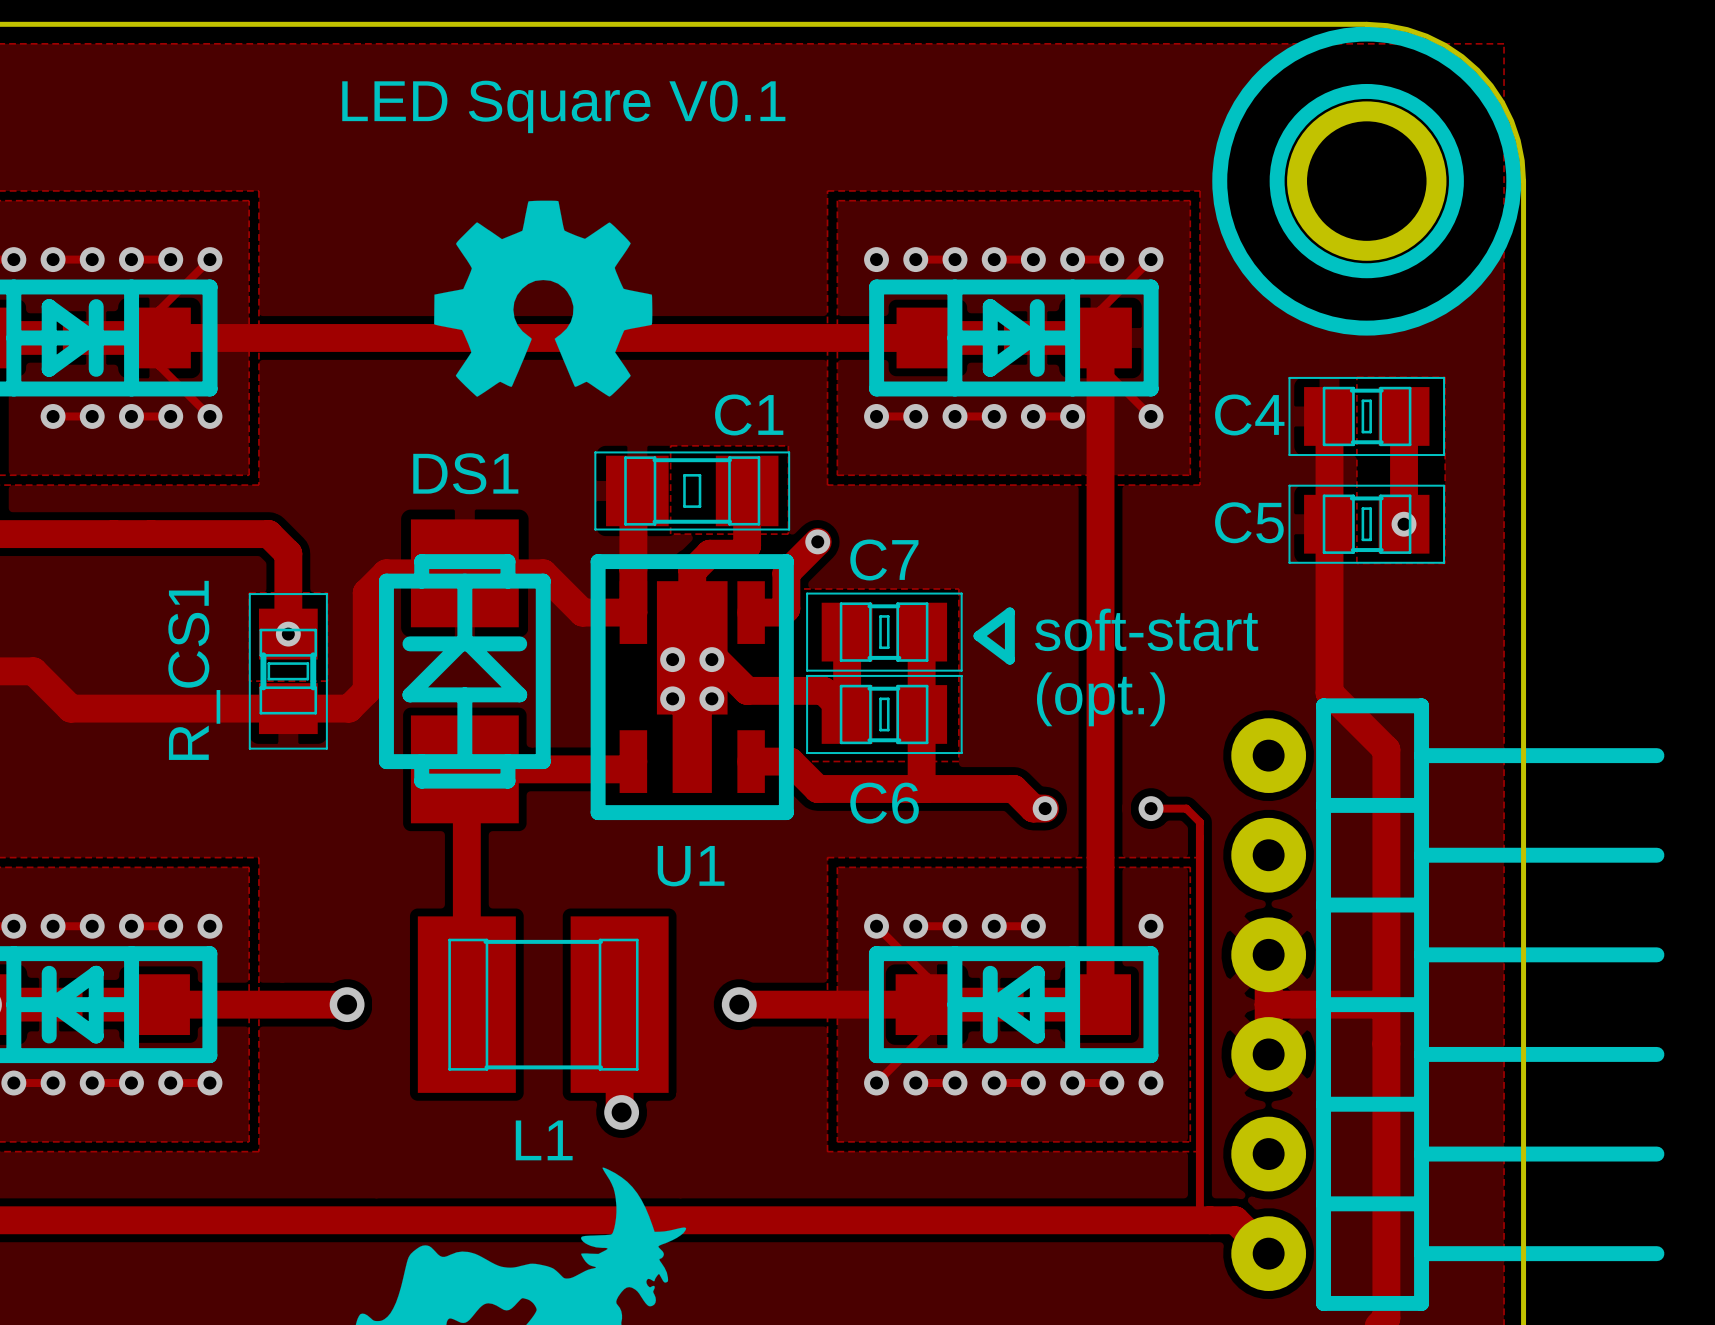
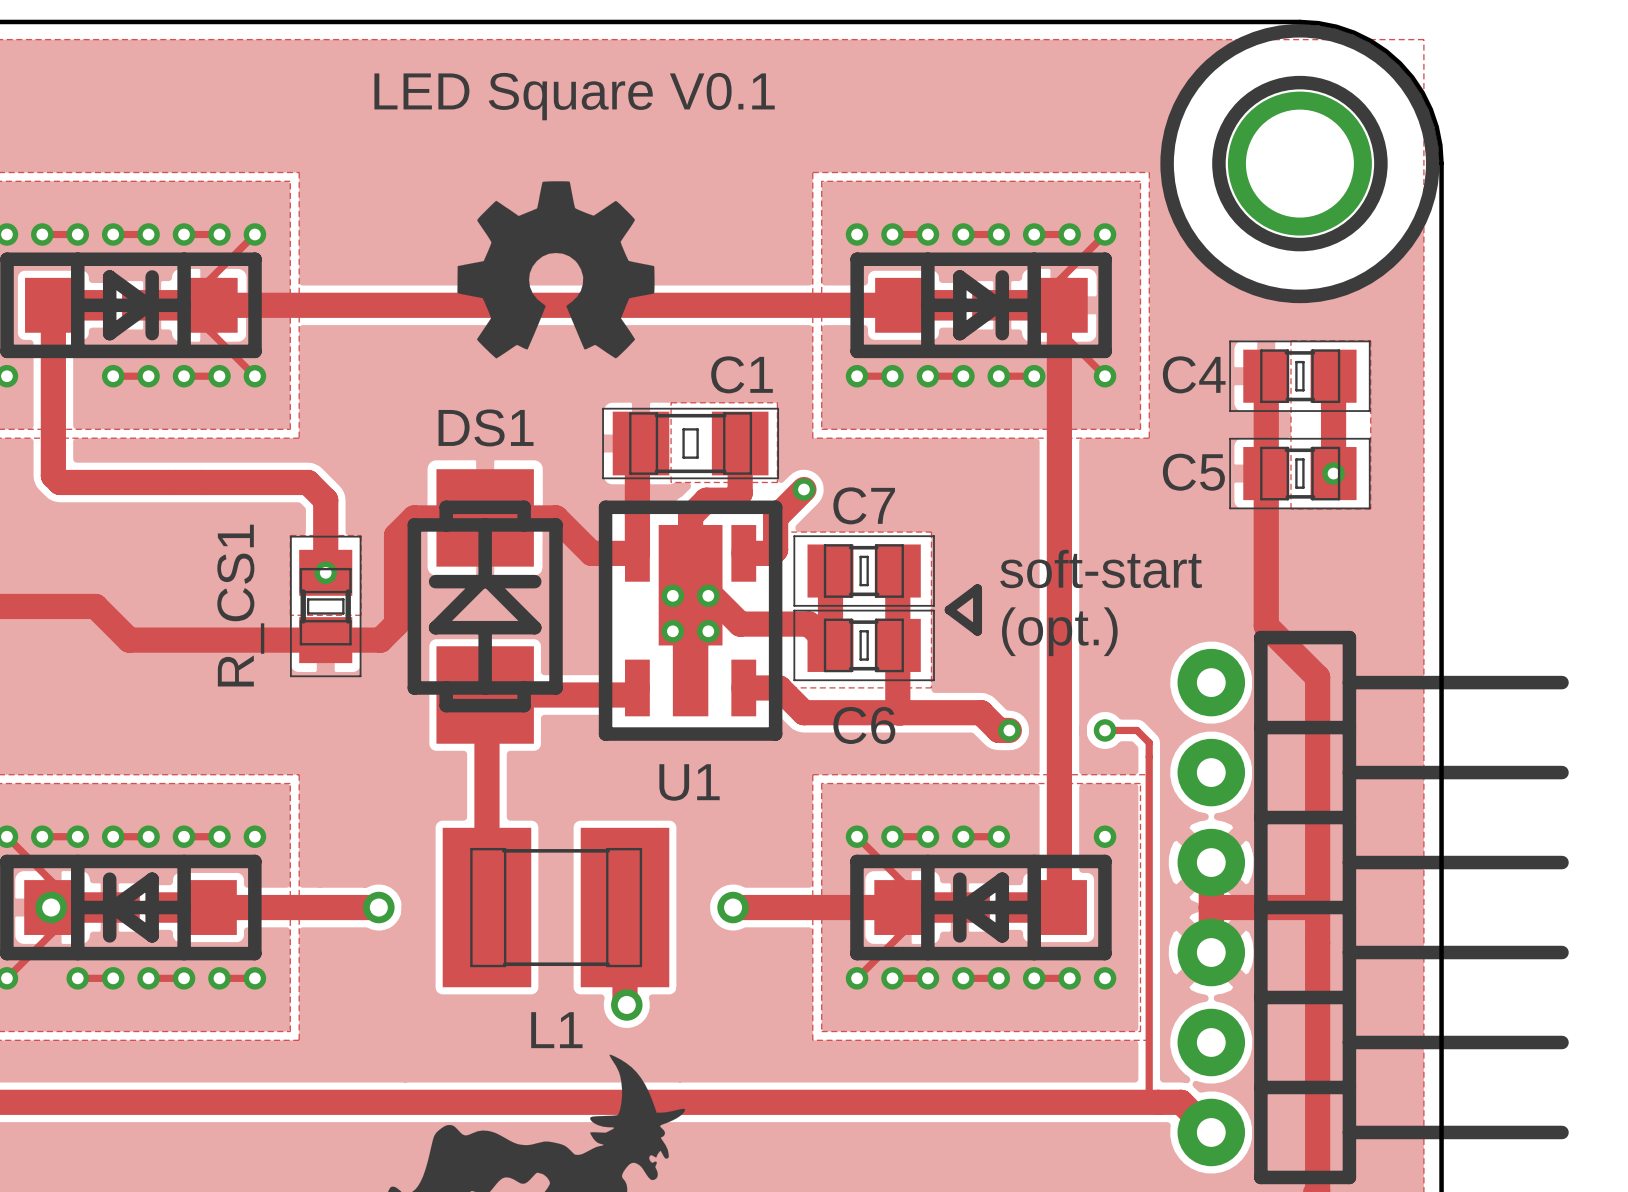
line: (1009, 651) (1009, 612) (978, 635) (1009, 659) -> (977, 588) (949, 609) (977, 631) (977, 595)

